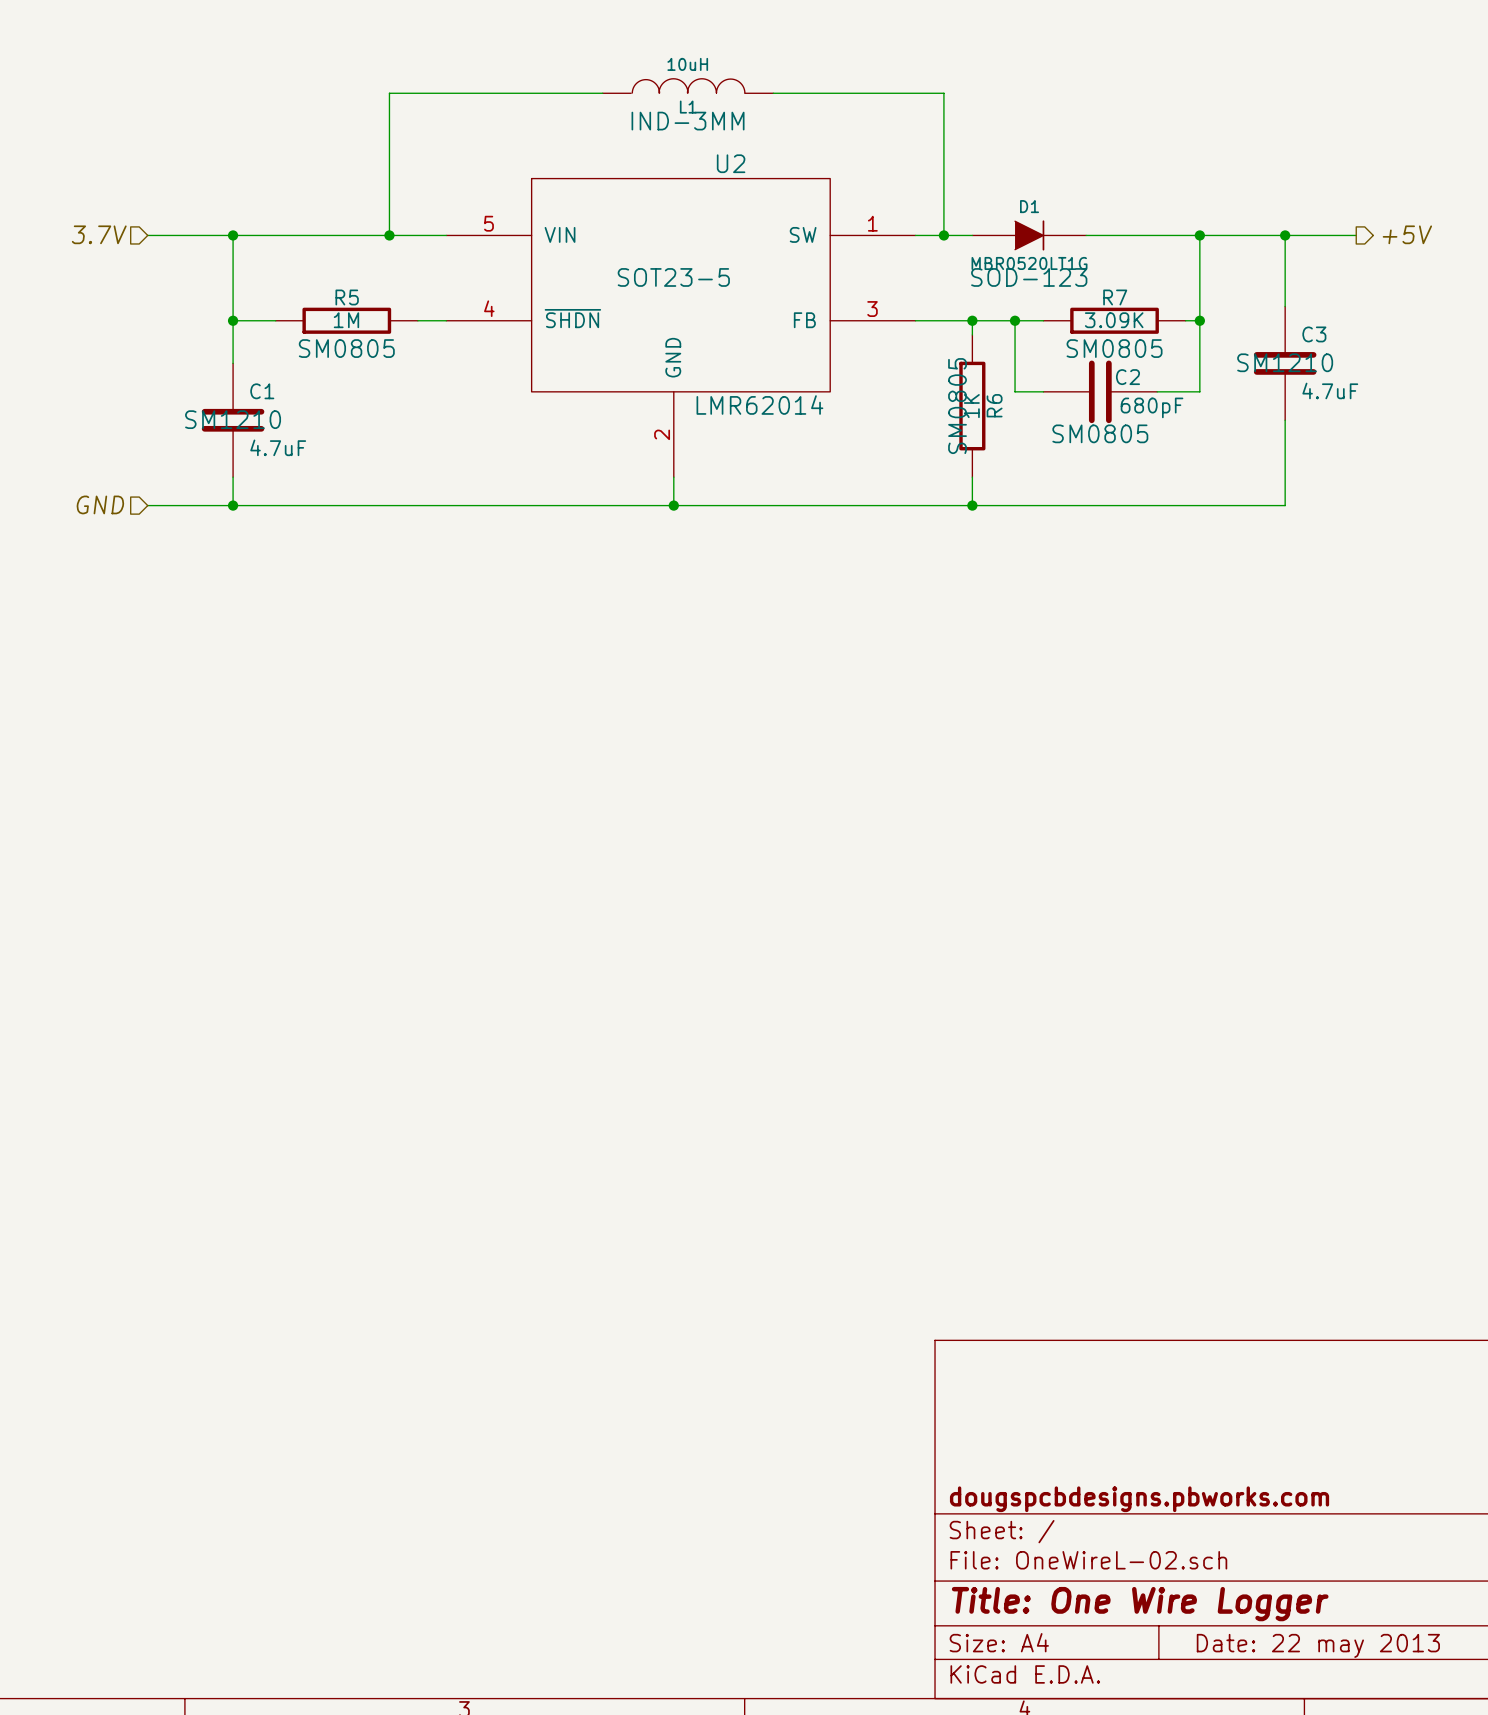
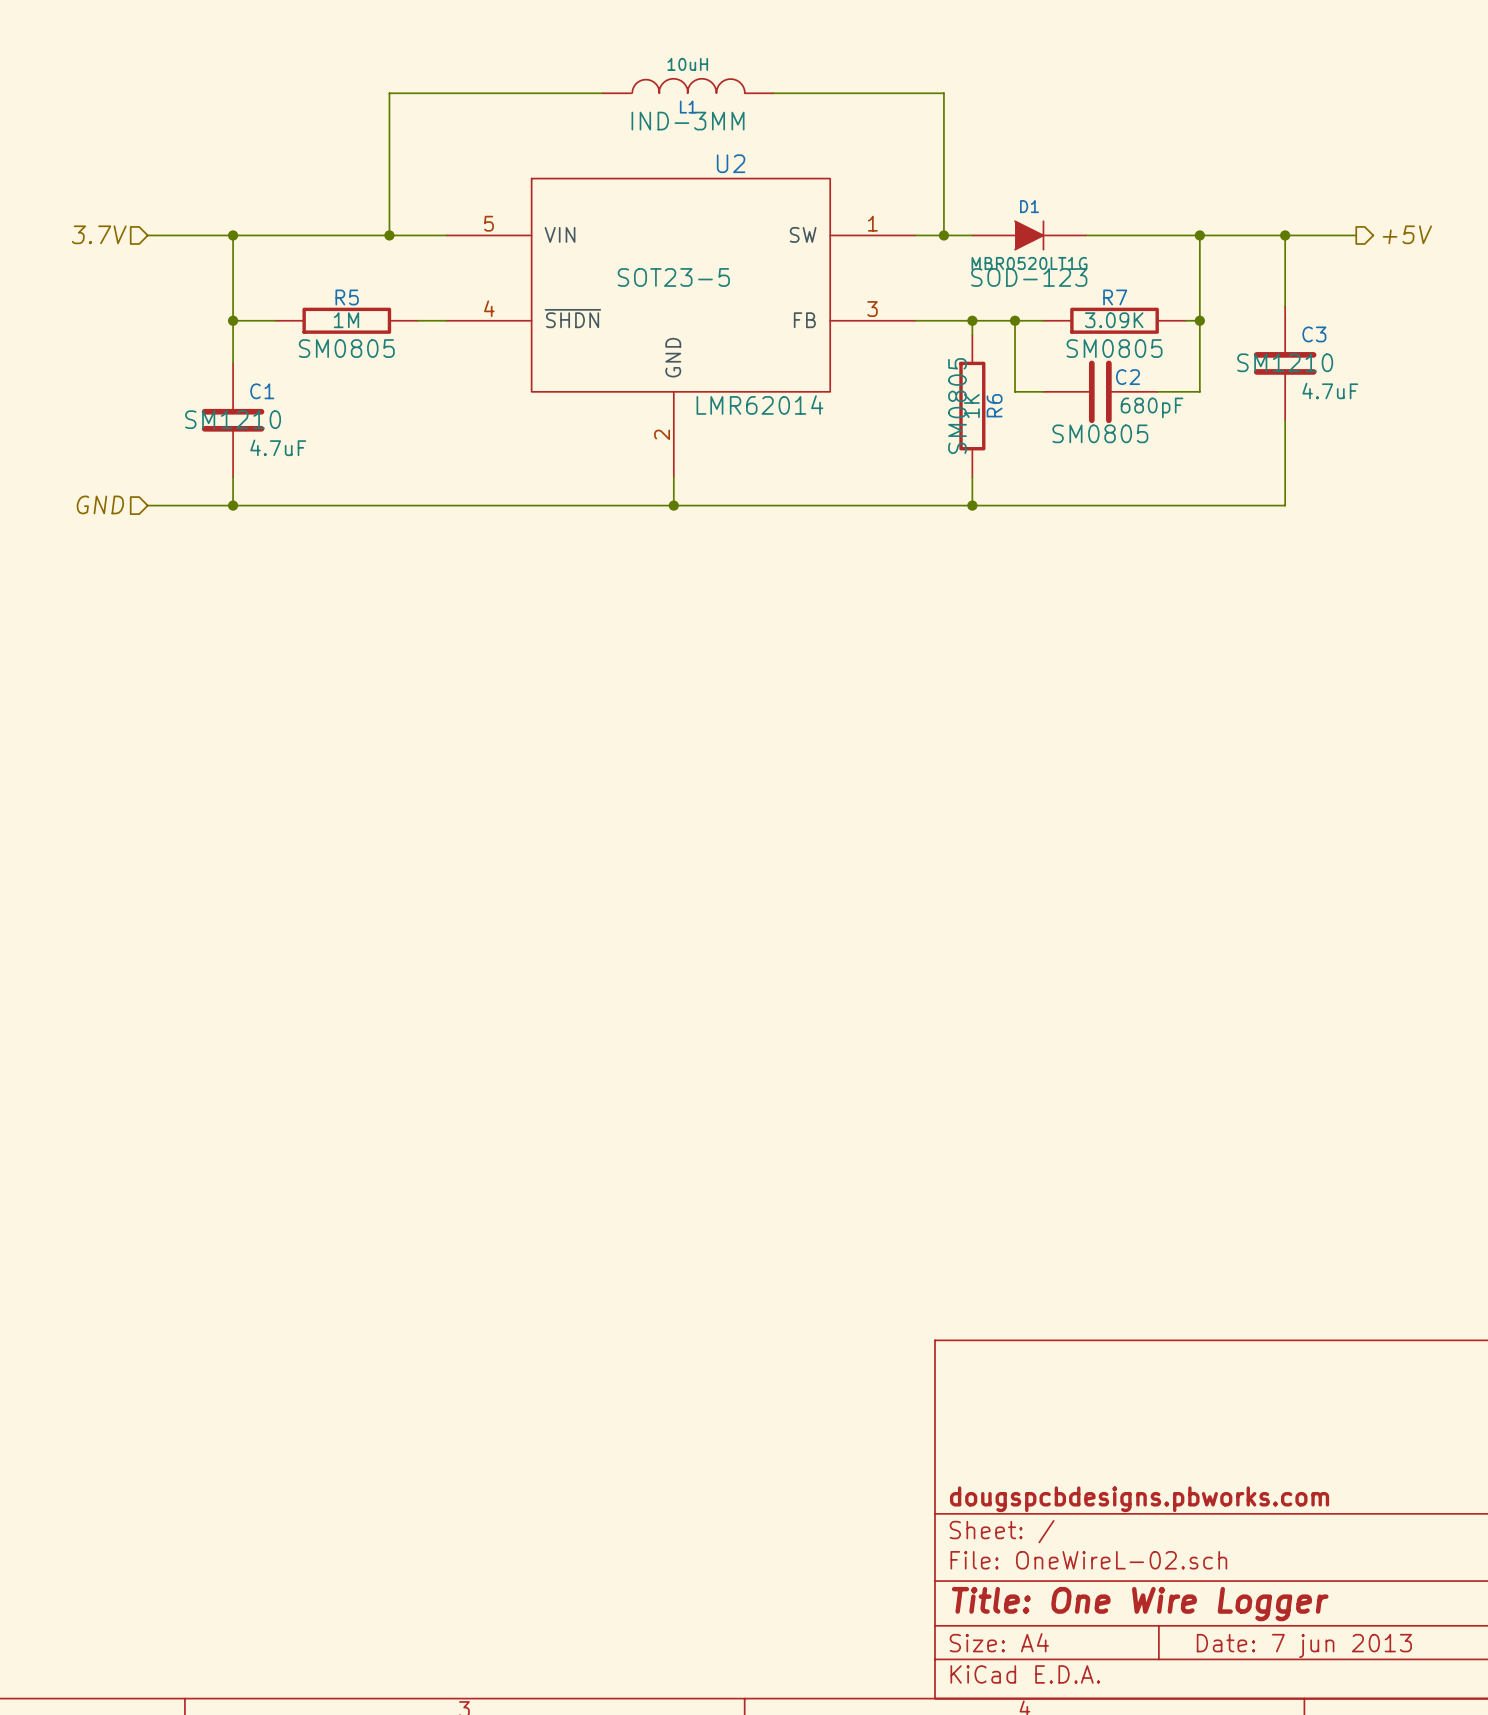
title block: Date: 22 may 2013 (1318, 1645) -> Date: 7 jun 2013 (1304, 1645)

